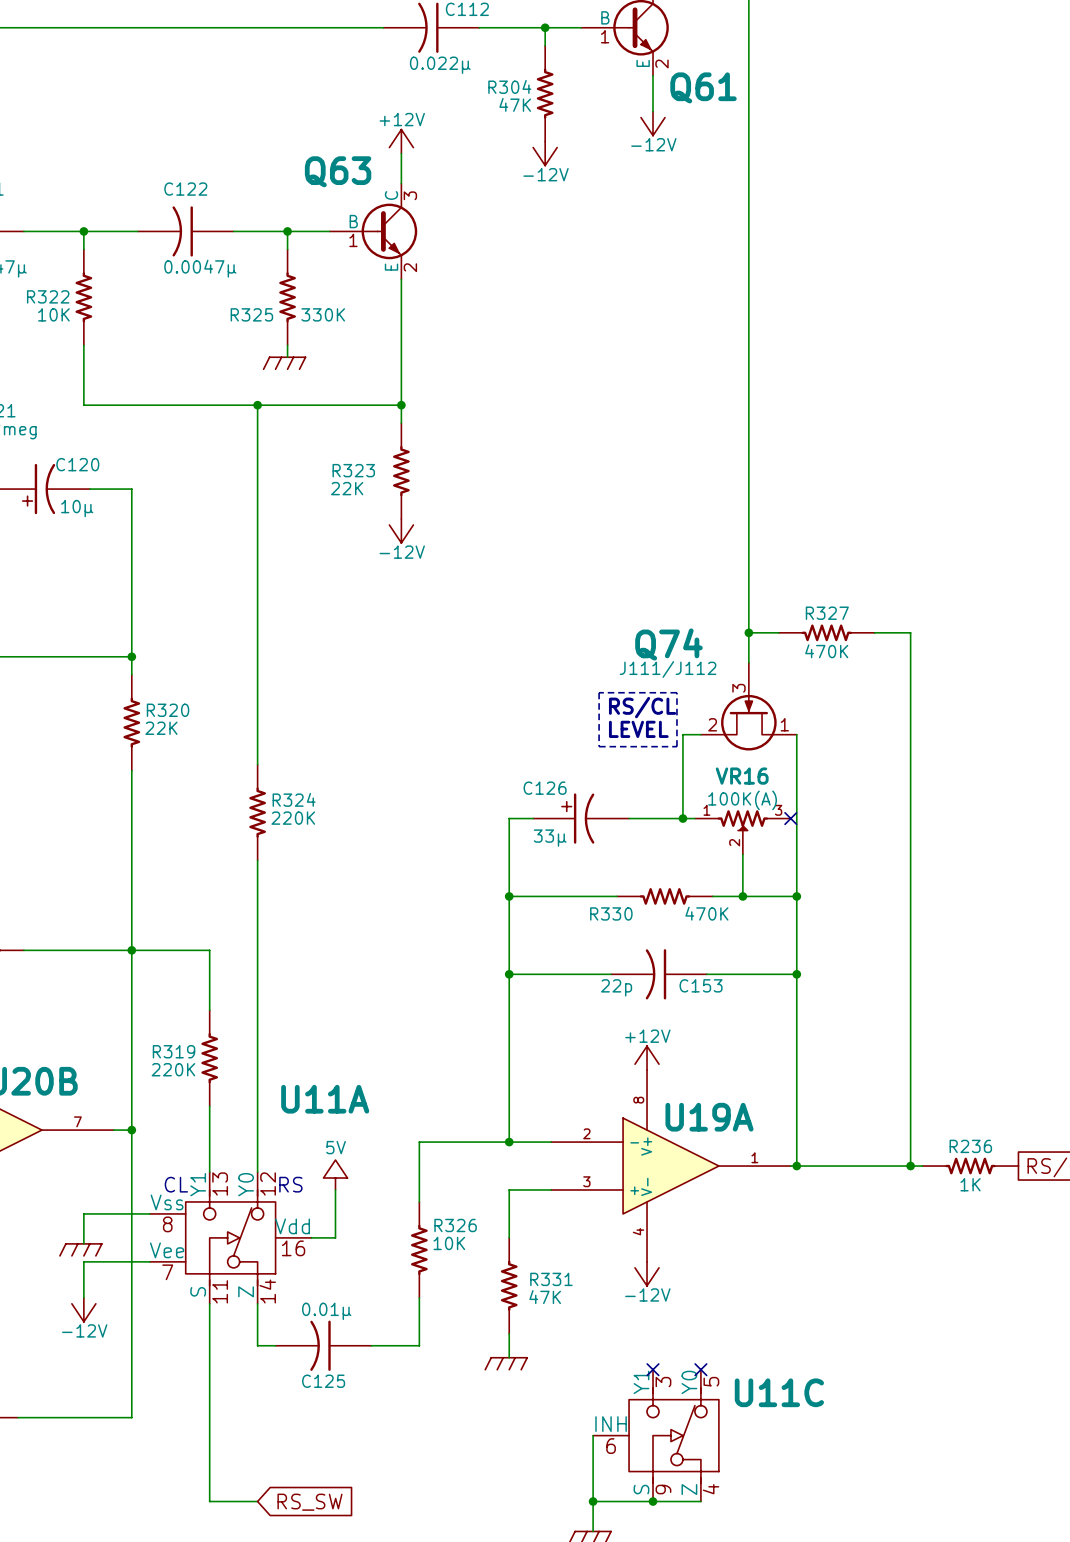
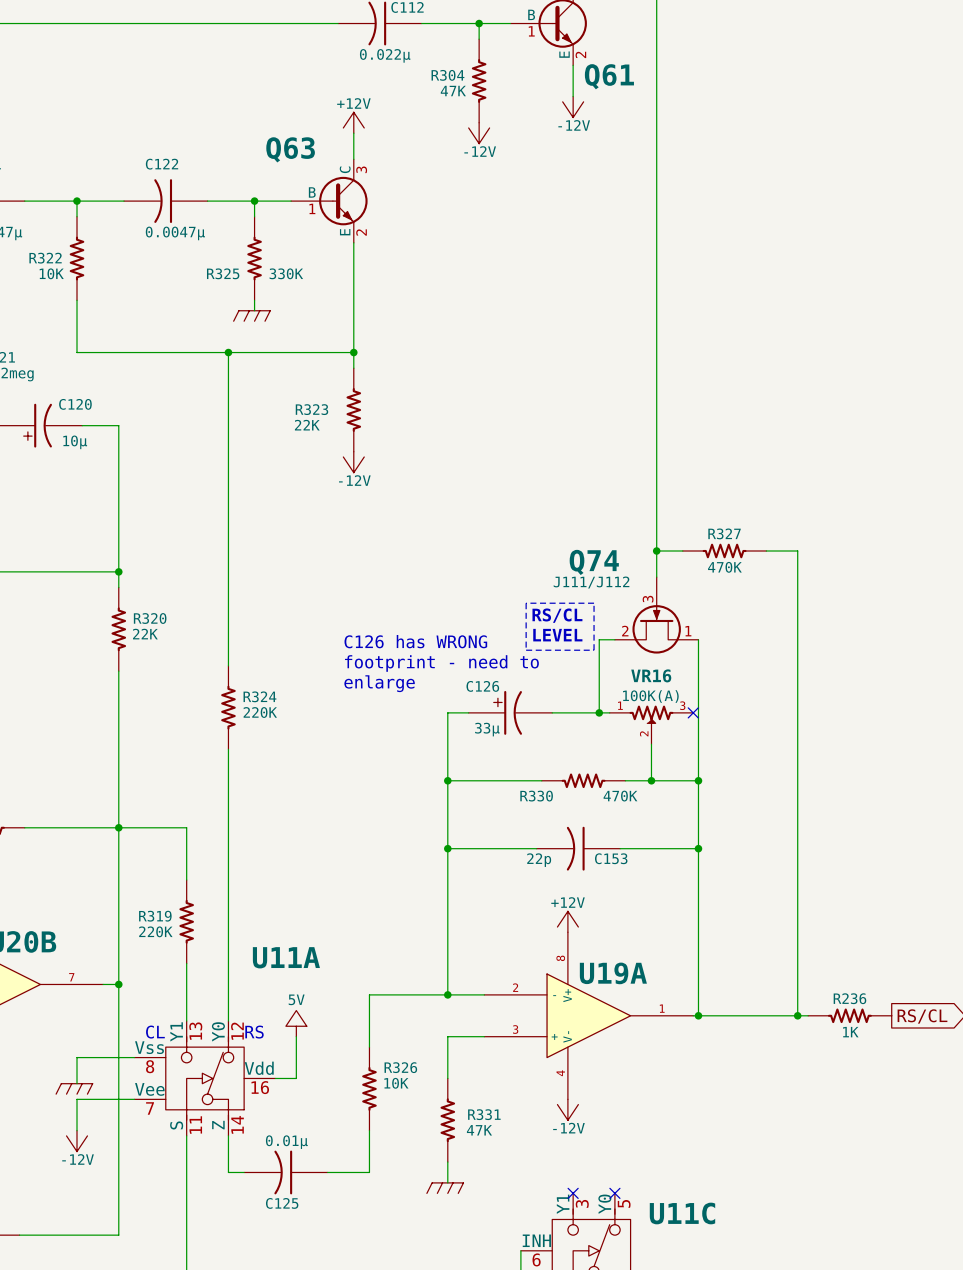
text: none -> C126 has WRONG (415, 641)
text: none -> footprint - need to (441, 663)
text: none -> enlarge (379, 683)

